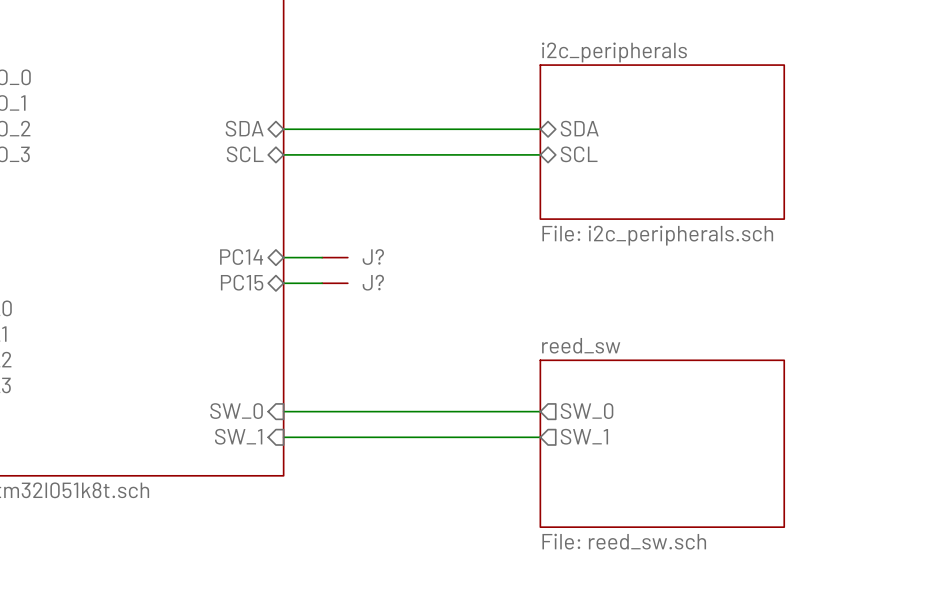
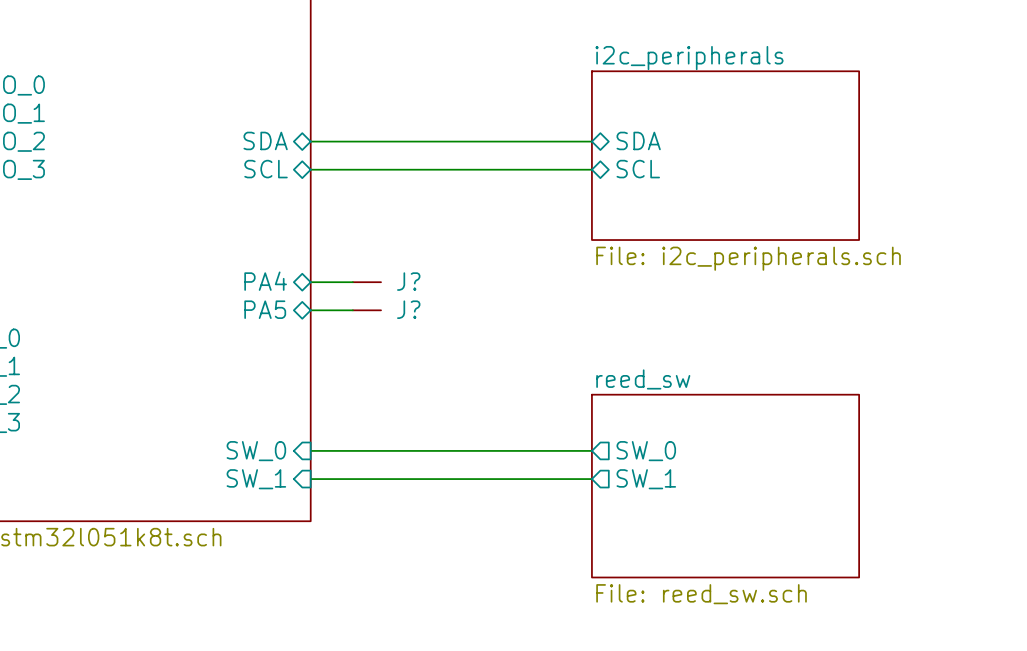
sheet pin: PC14 (241, 257) -> PA4 (265, 281)
sheet pin: PC15 (242, 282) -> PA5 (265, 309)

